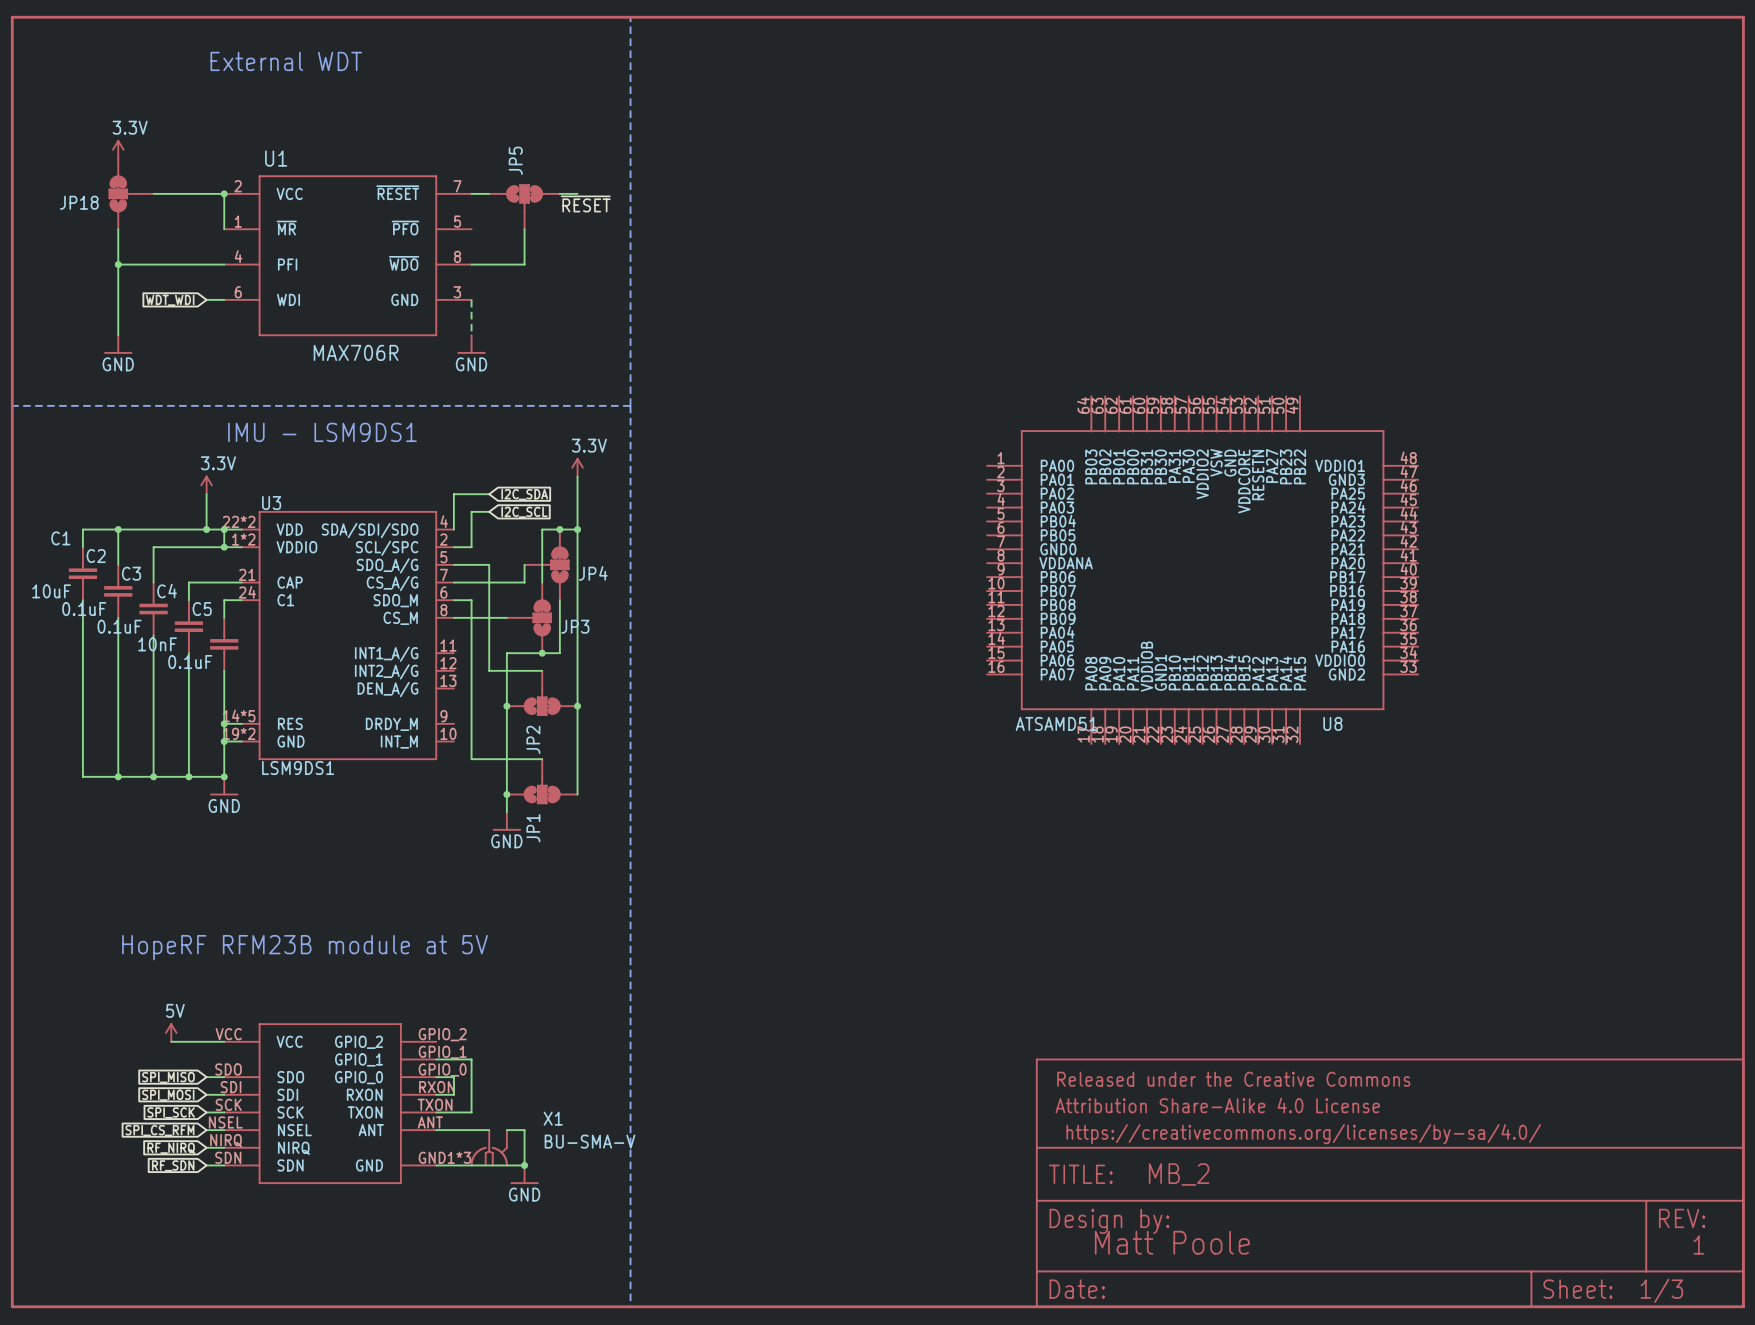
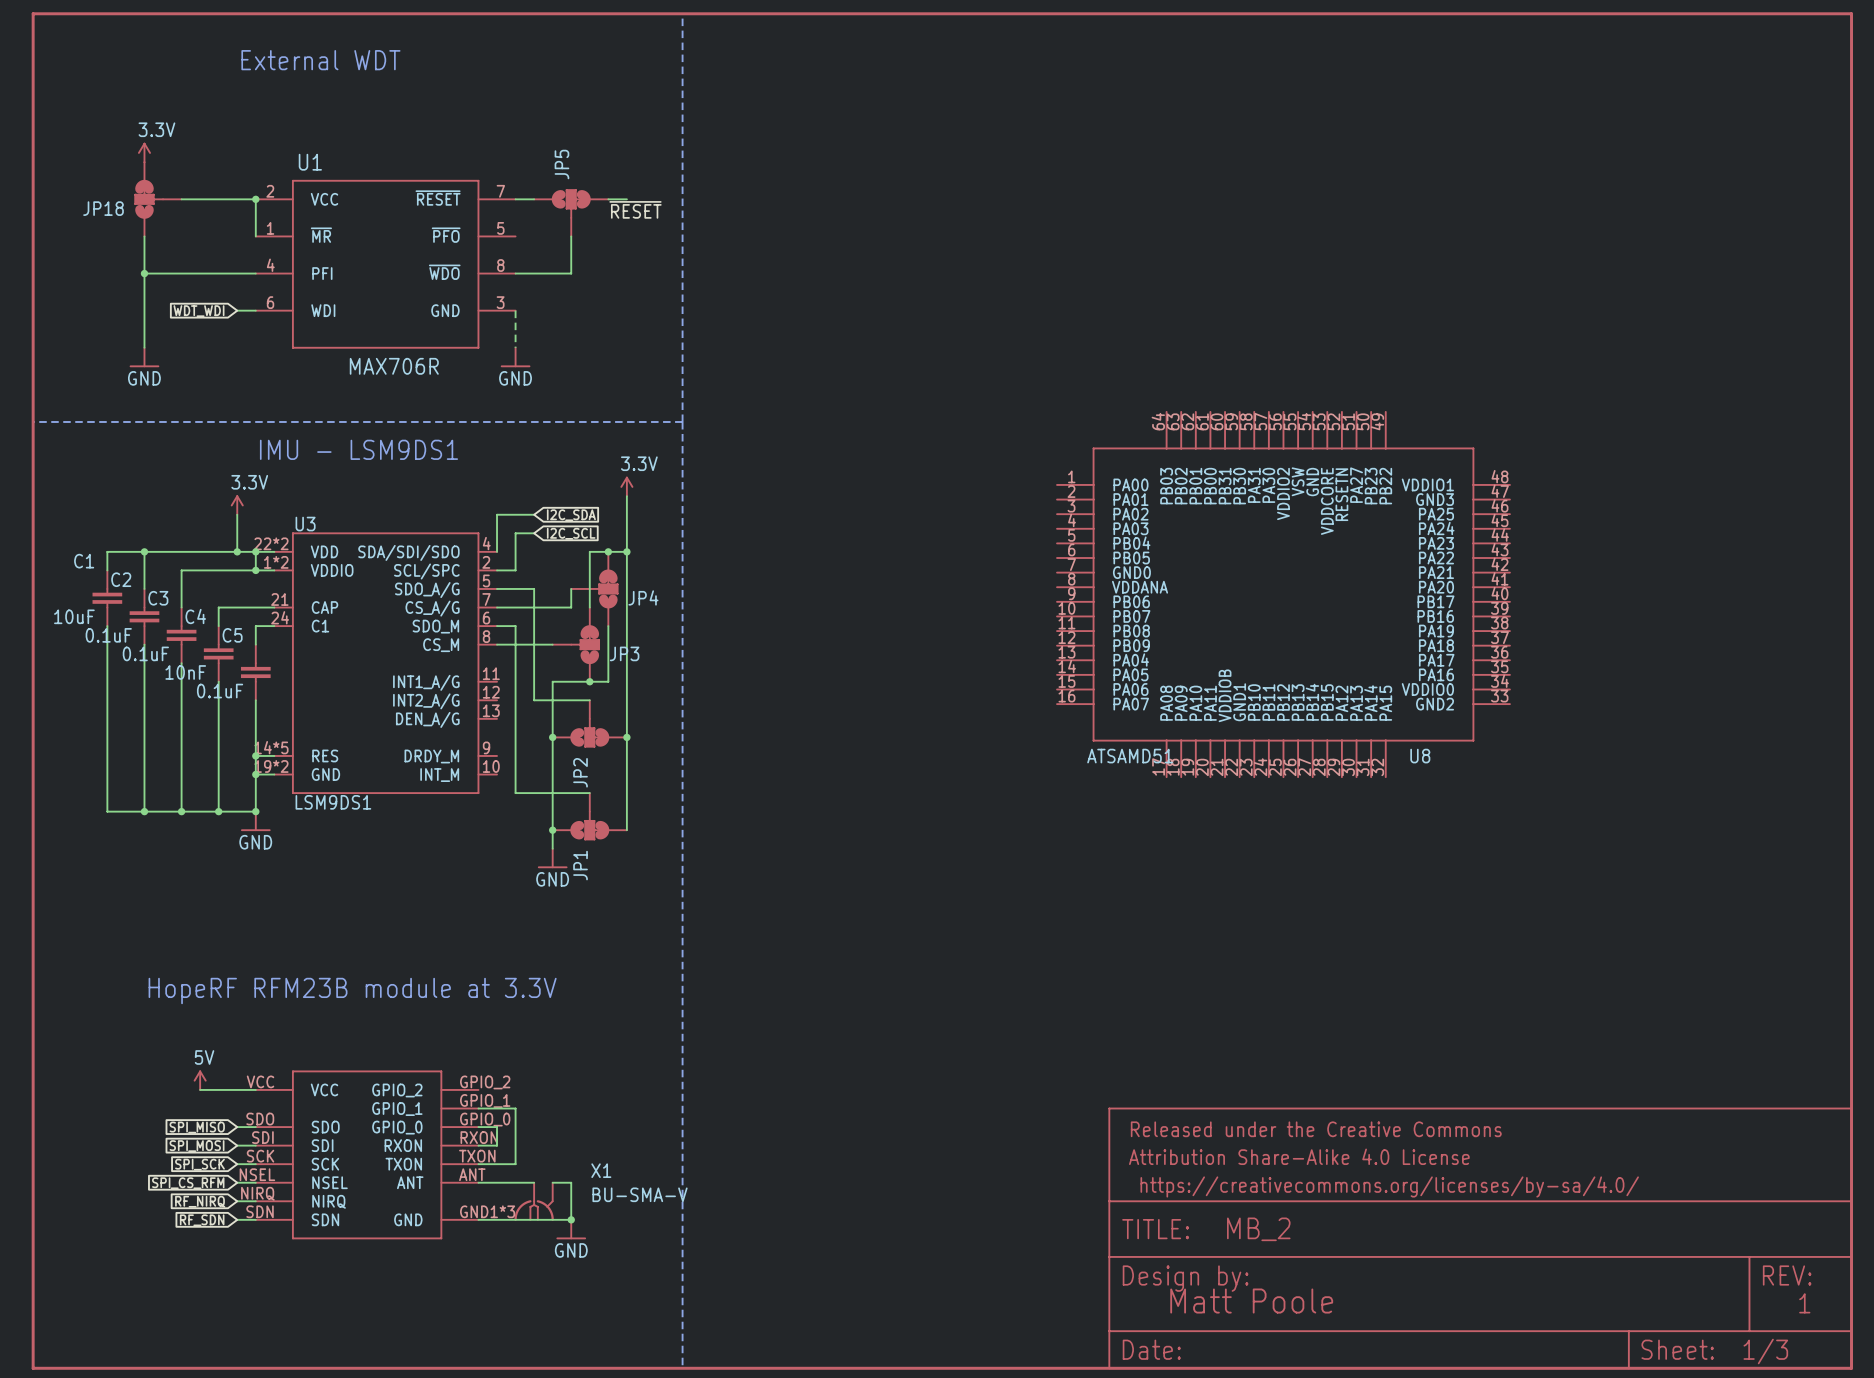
text: HopeRF RFM23B module at 5V (305, 947) -> HopeRF RFM23B module at 3.3V (352, 991)

